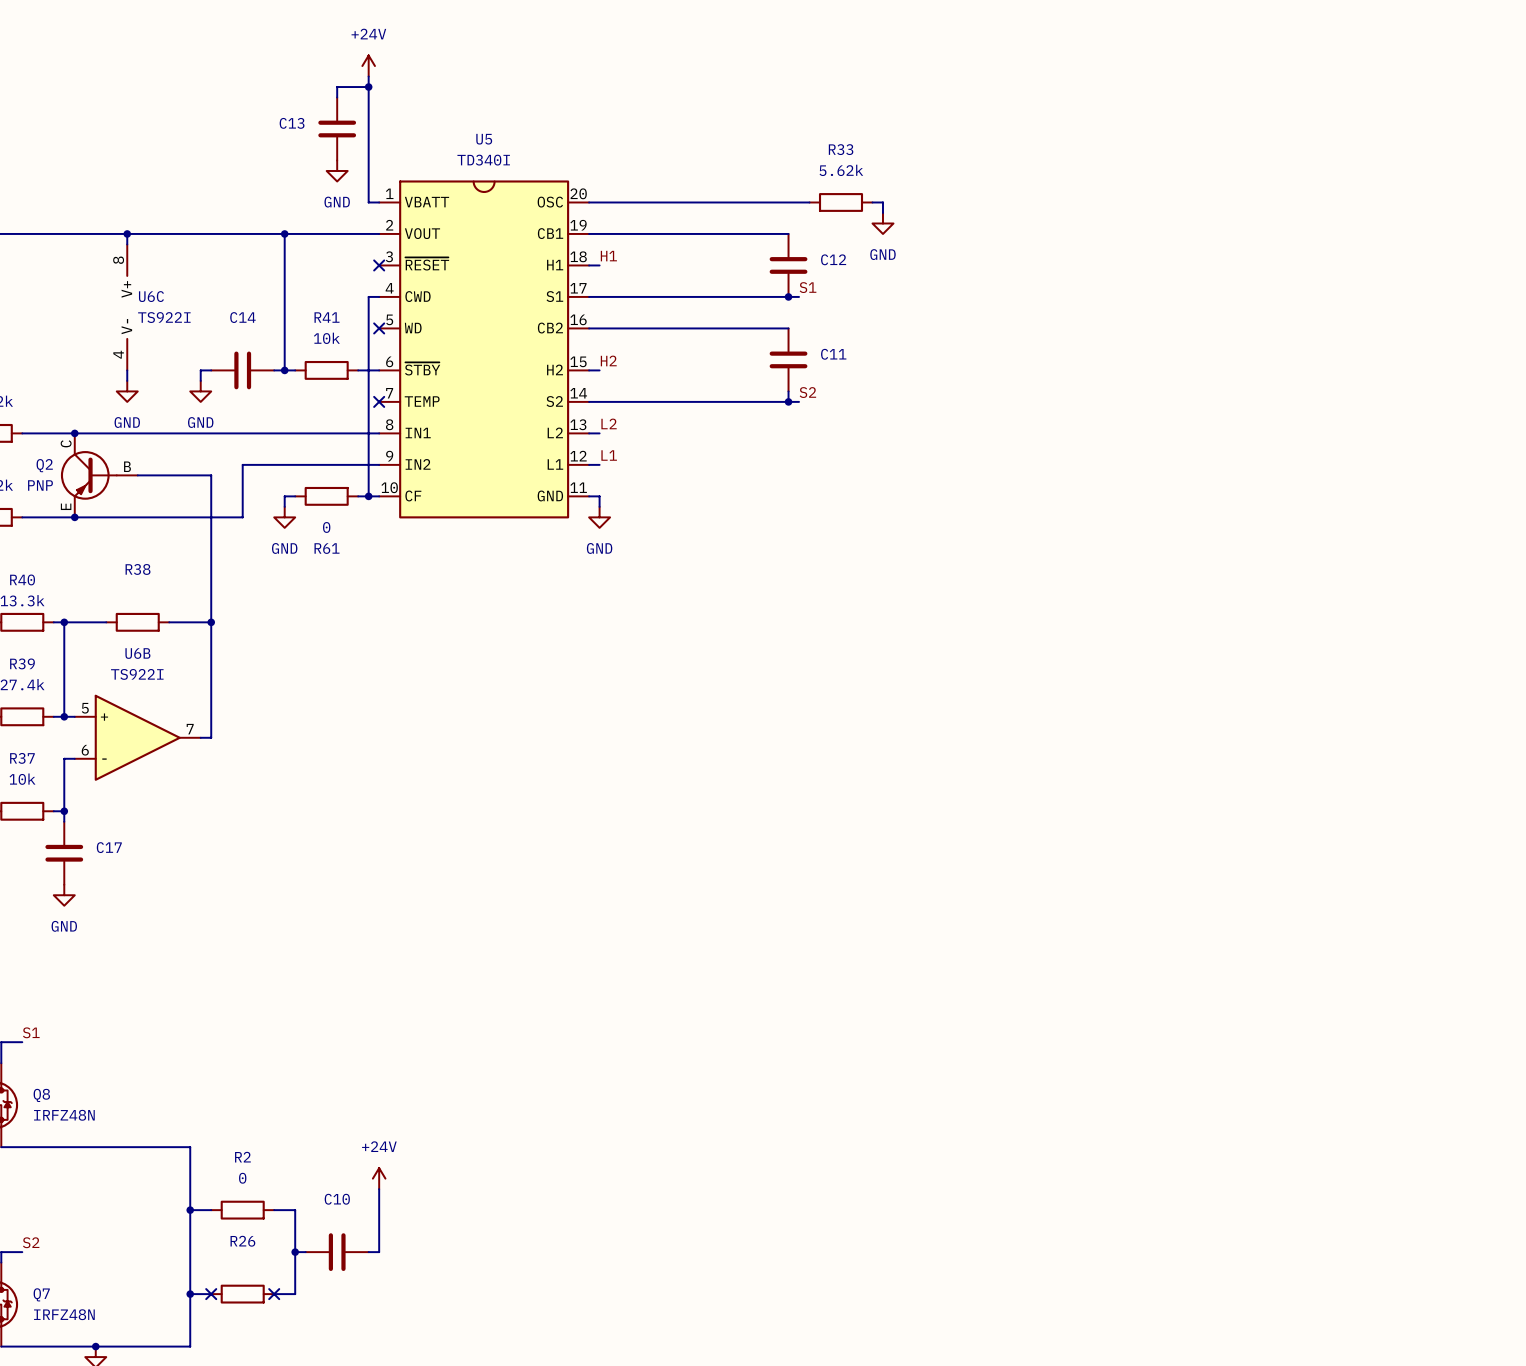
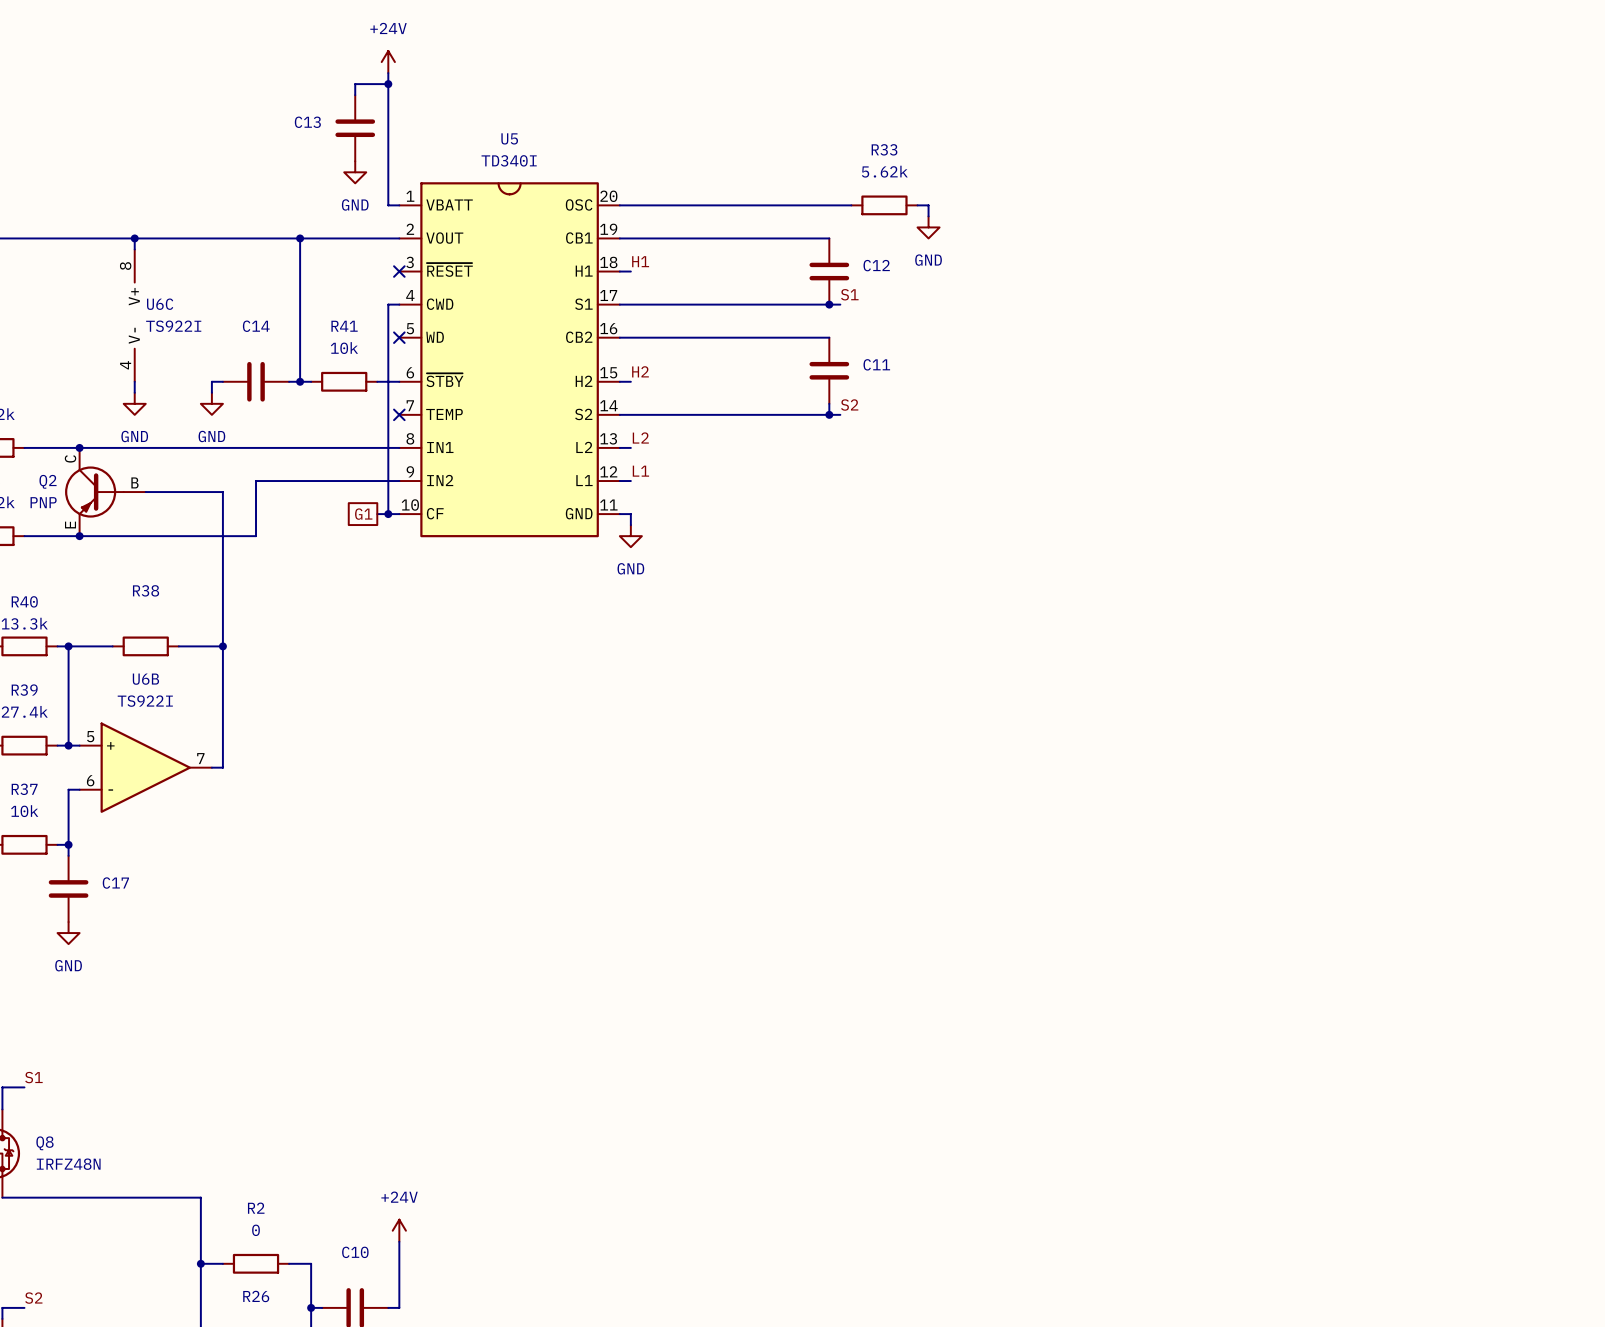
wire: (295, 496) (284, 496) (284, 506) -> none
R61: 0 (326, 496) -> none
global label: none -> G1 (363, 514)
power symbol: GND (284, 517) -> none

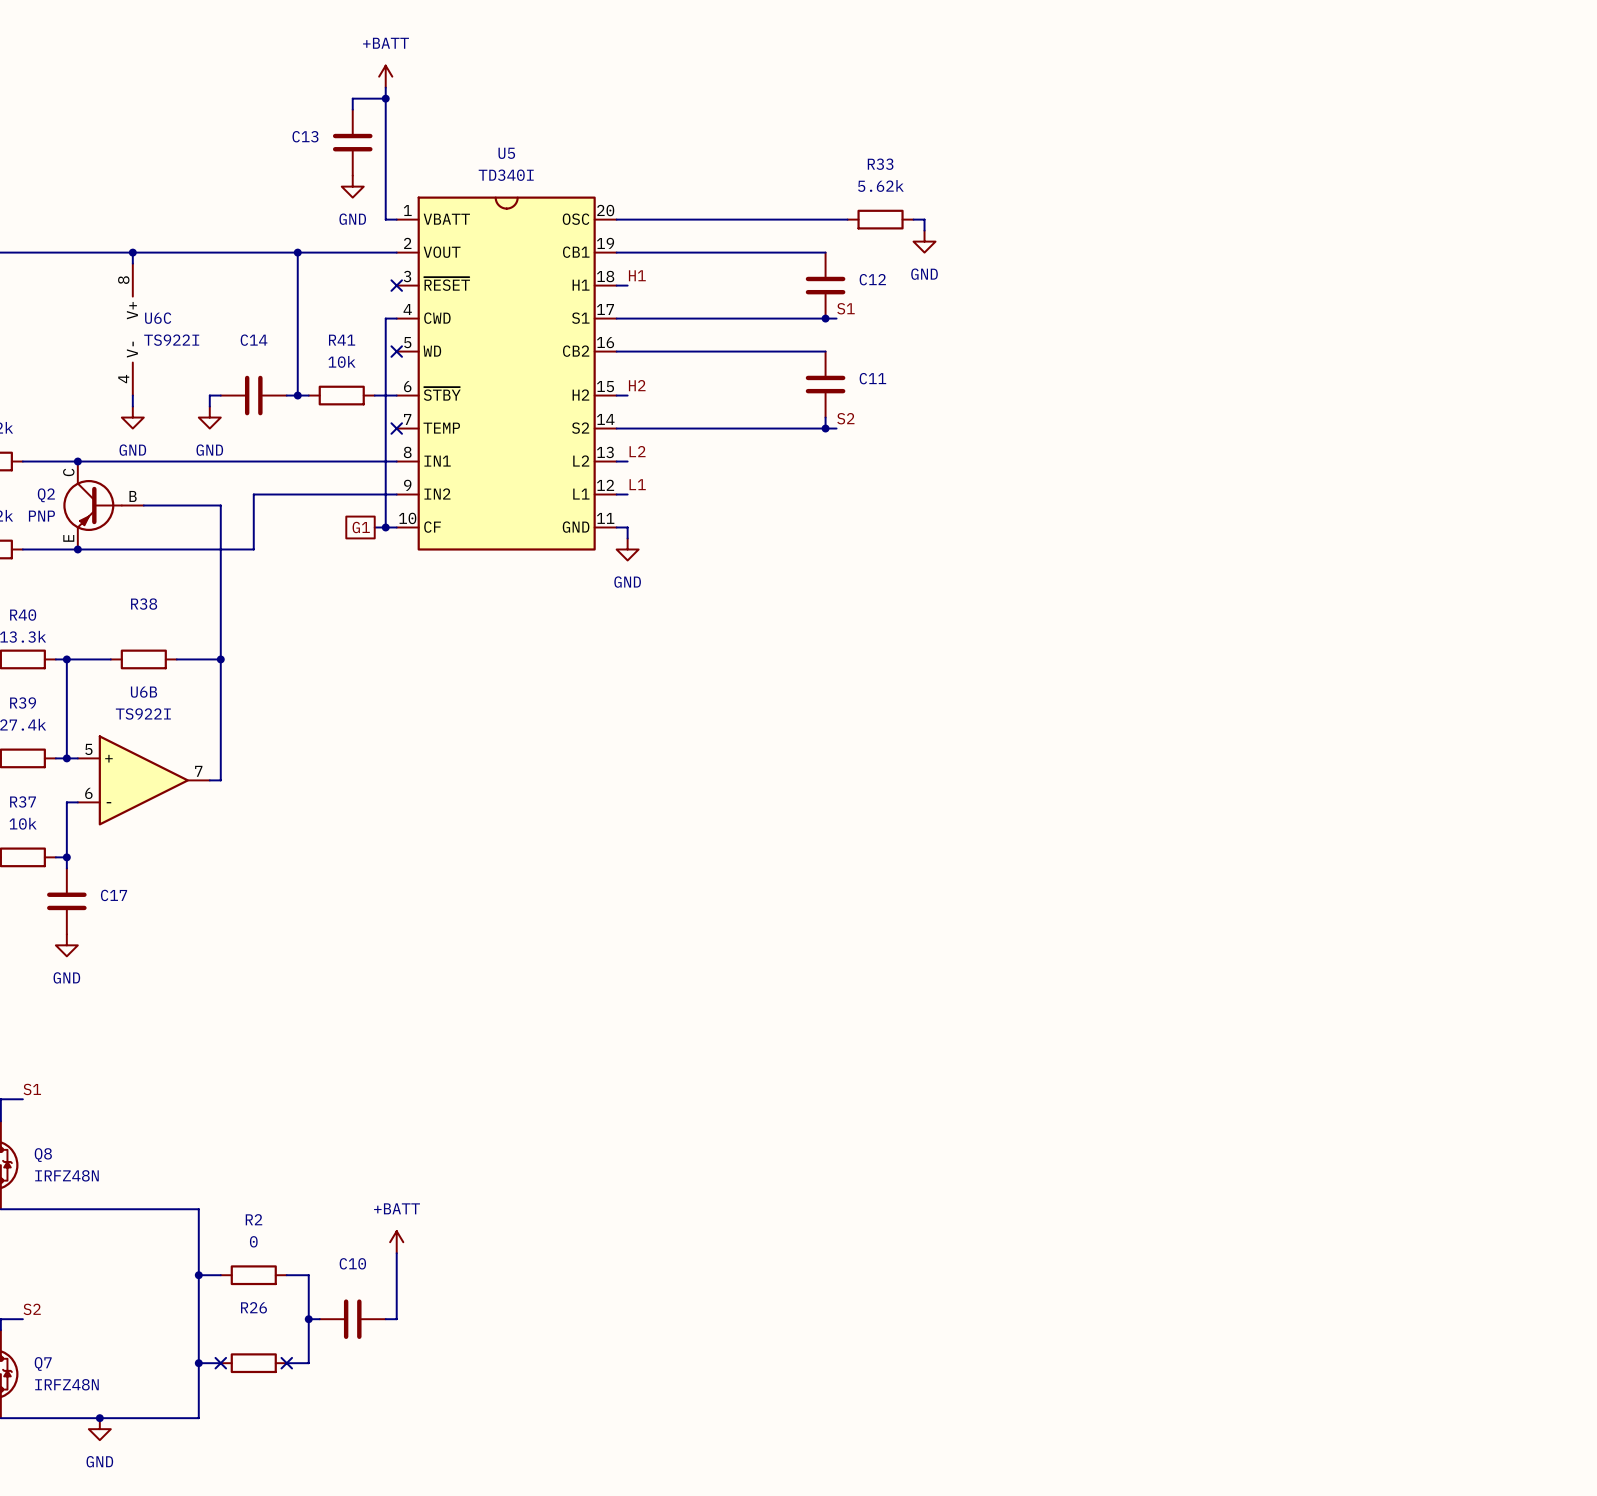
power symbol: +24V (388, 62) -> +BATT (385, 76)
power symbol: +24V (399, 1230) -> +BATT (396, 1242)

